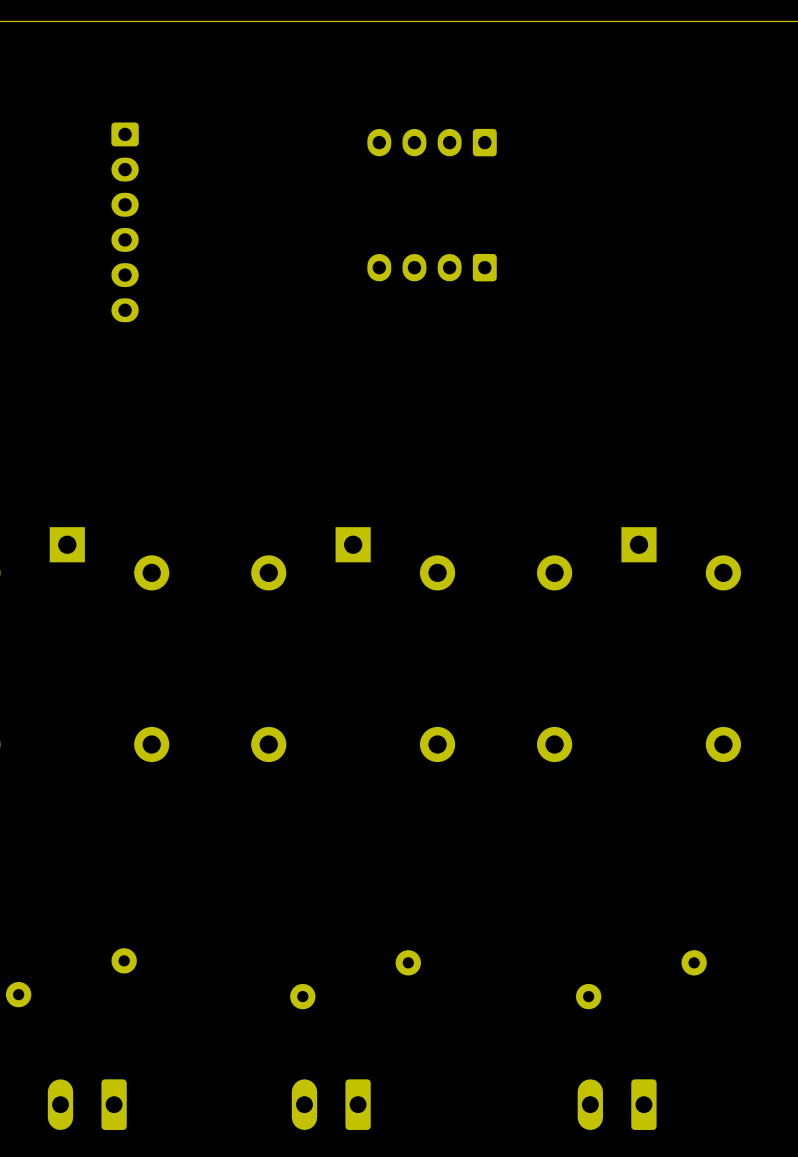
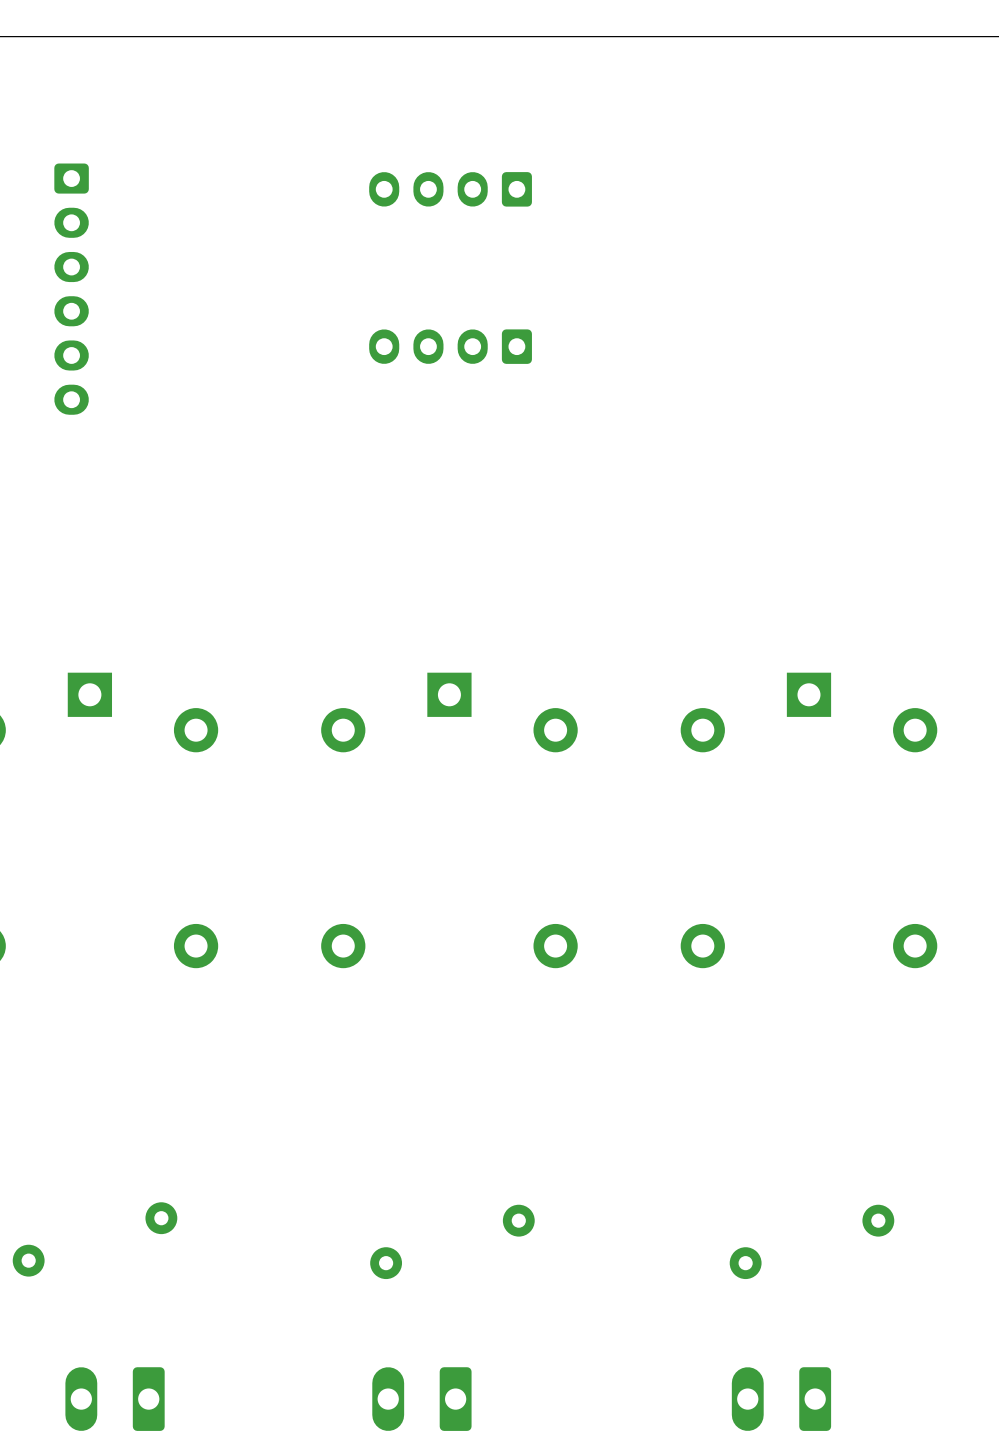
part: none -> (450, 189)
part: (432, 142) -> none
part position: (125, 222) -> (71, 289)
part: none -> (450, 346)
part: (432, 267) -> none

